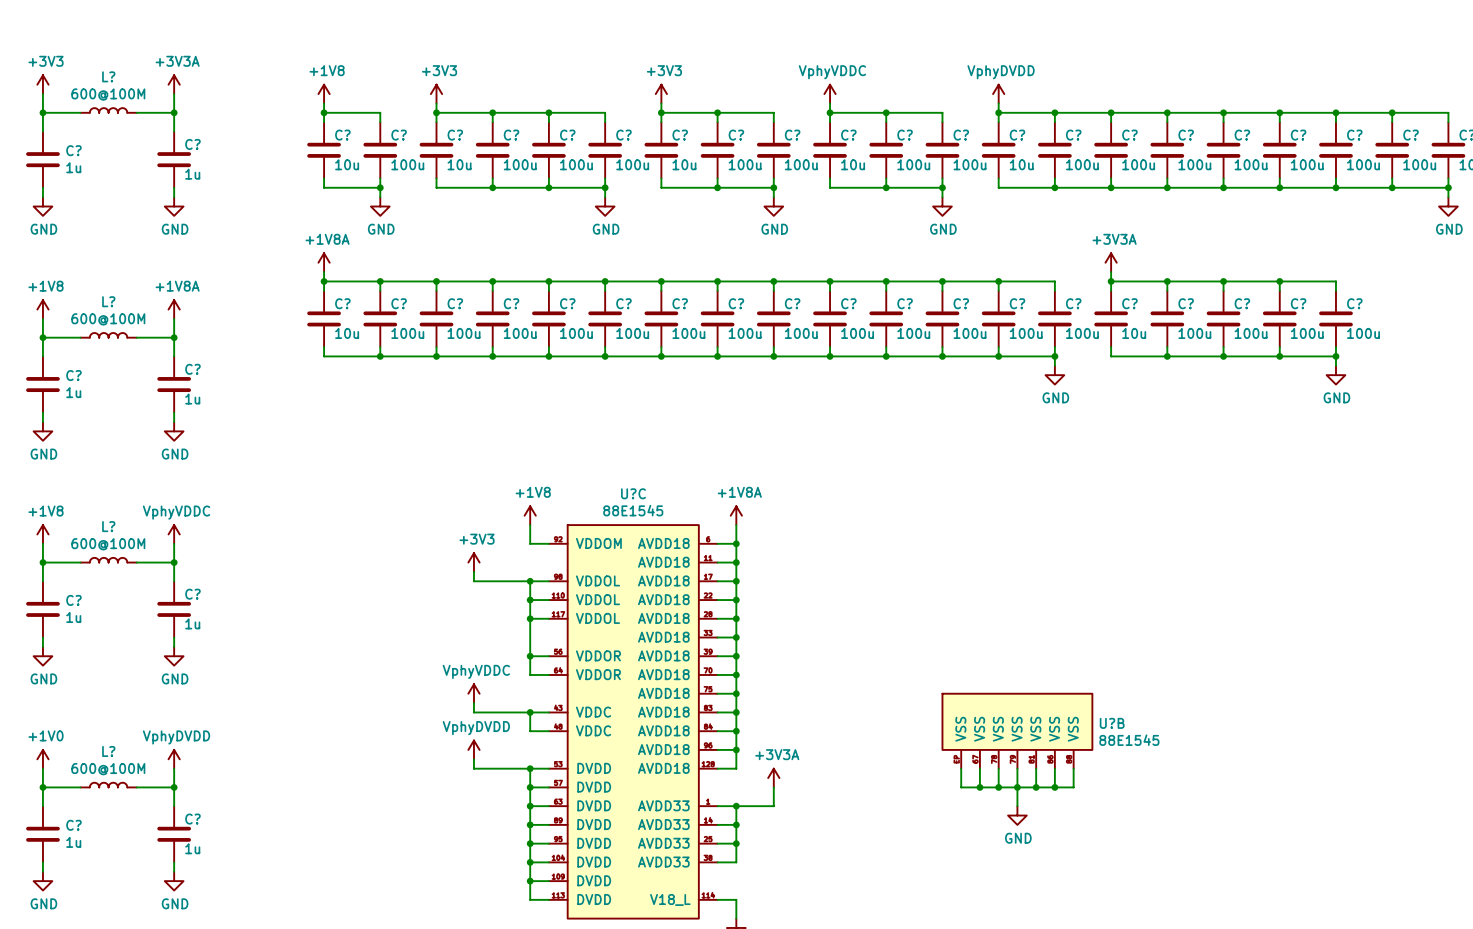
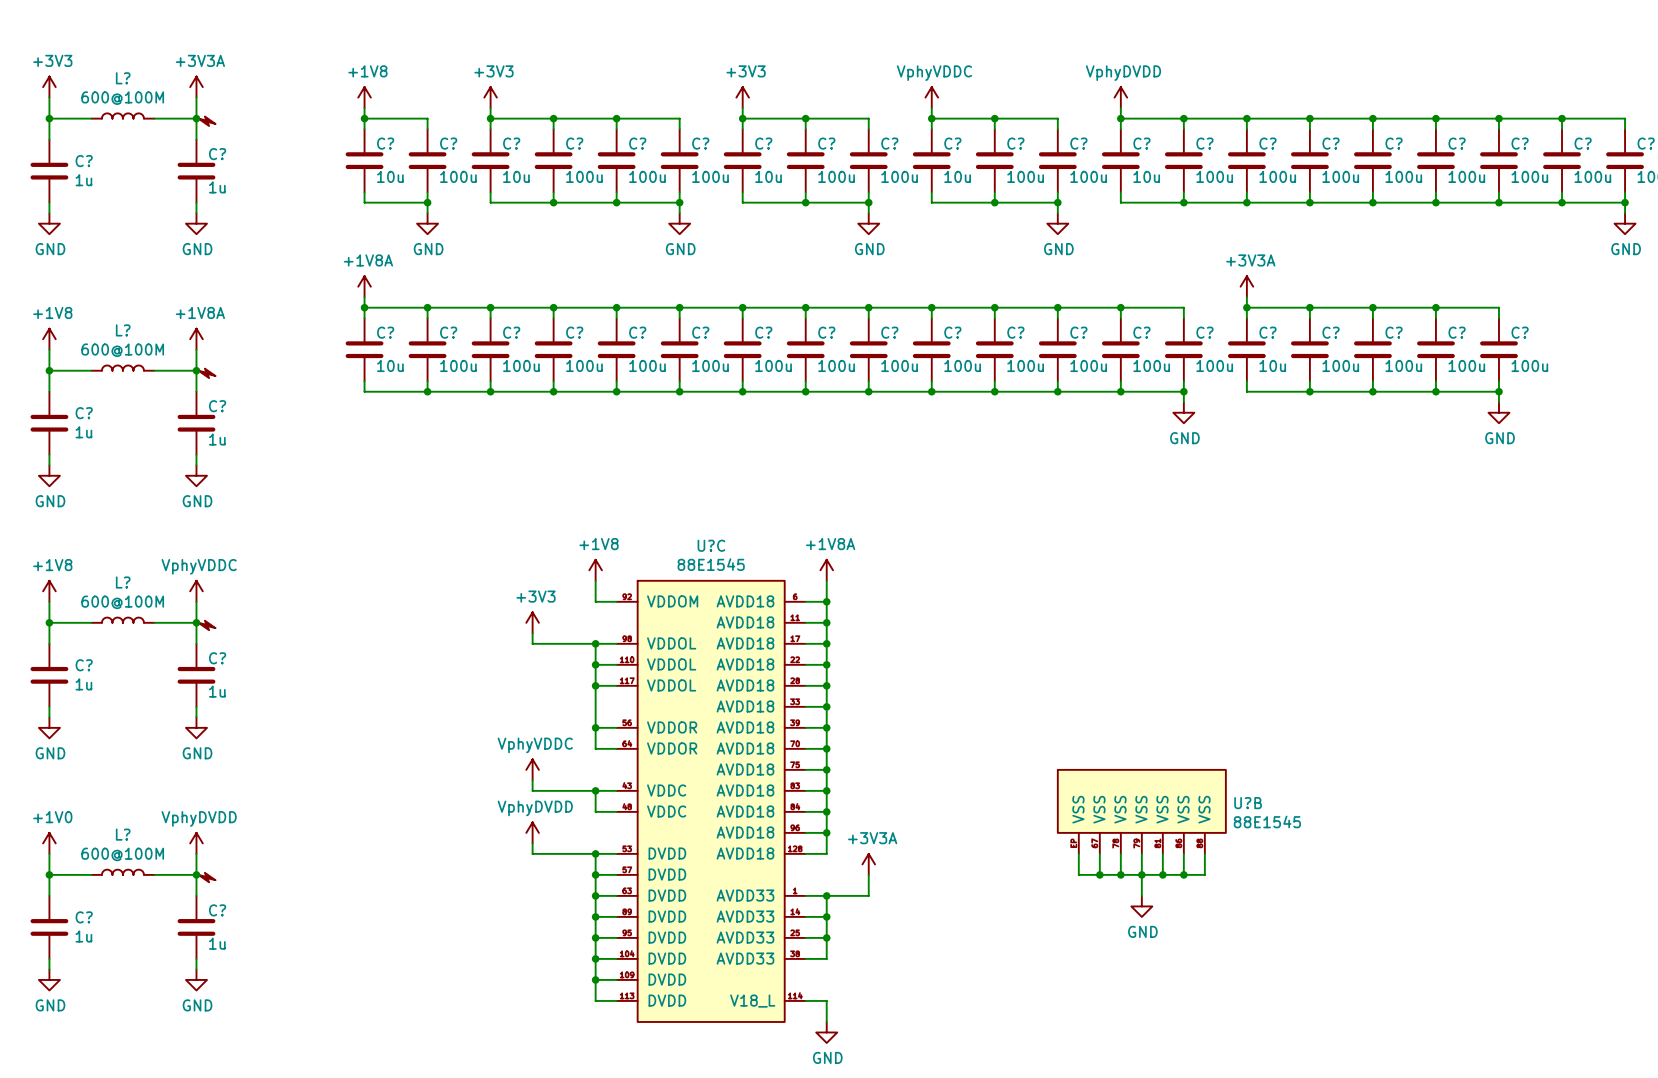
power symbol: none -> (206, 121)
power symbol: none -> (206, 373)
power symbol: none -> (206, 625)
power symbol: none -> (206, 877)

